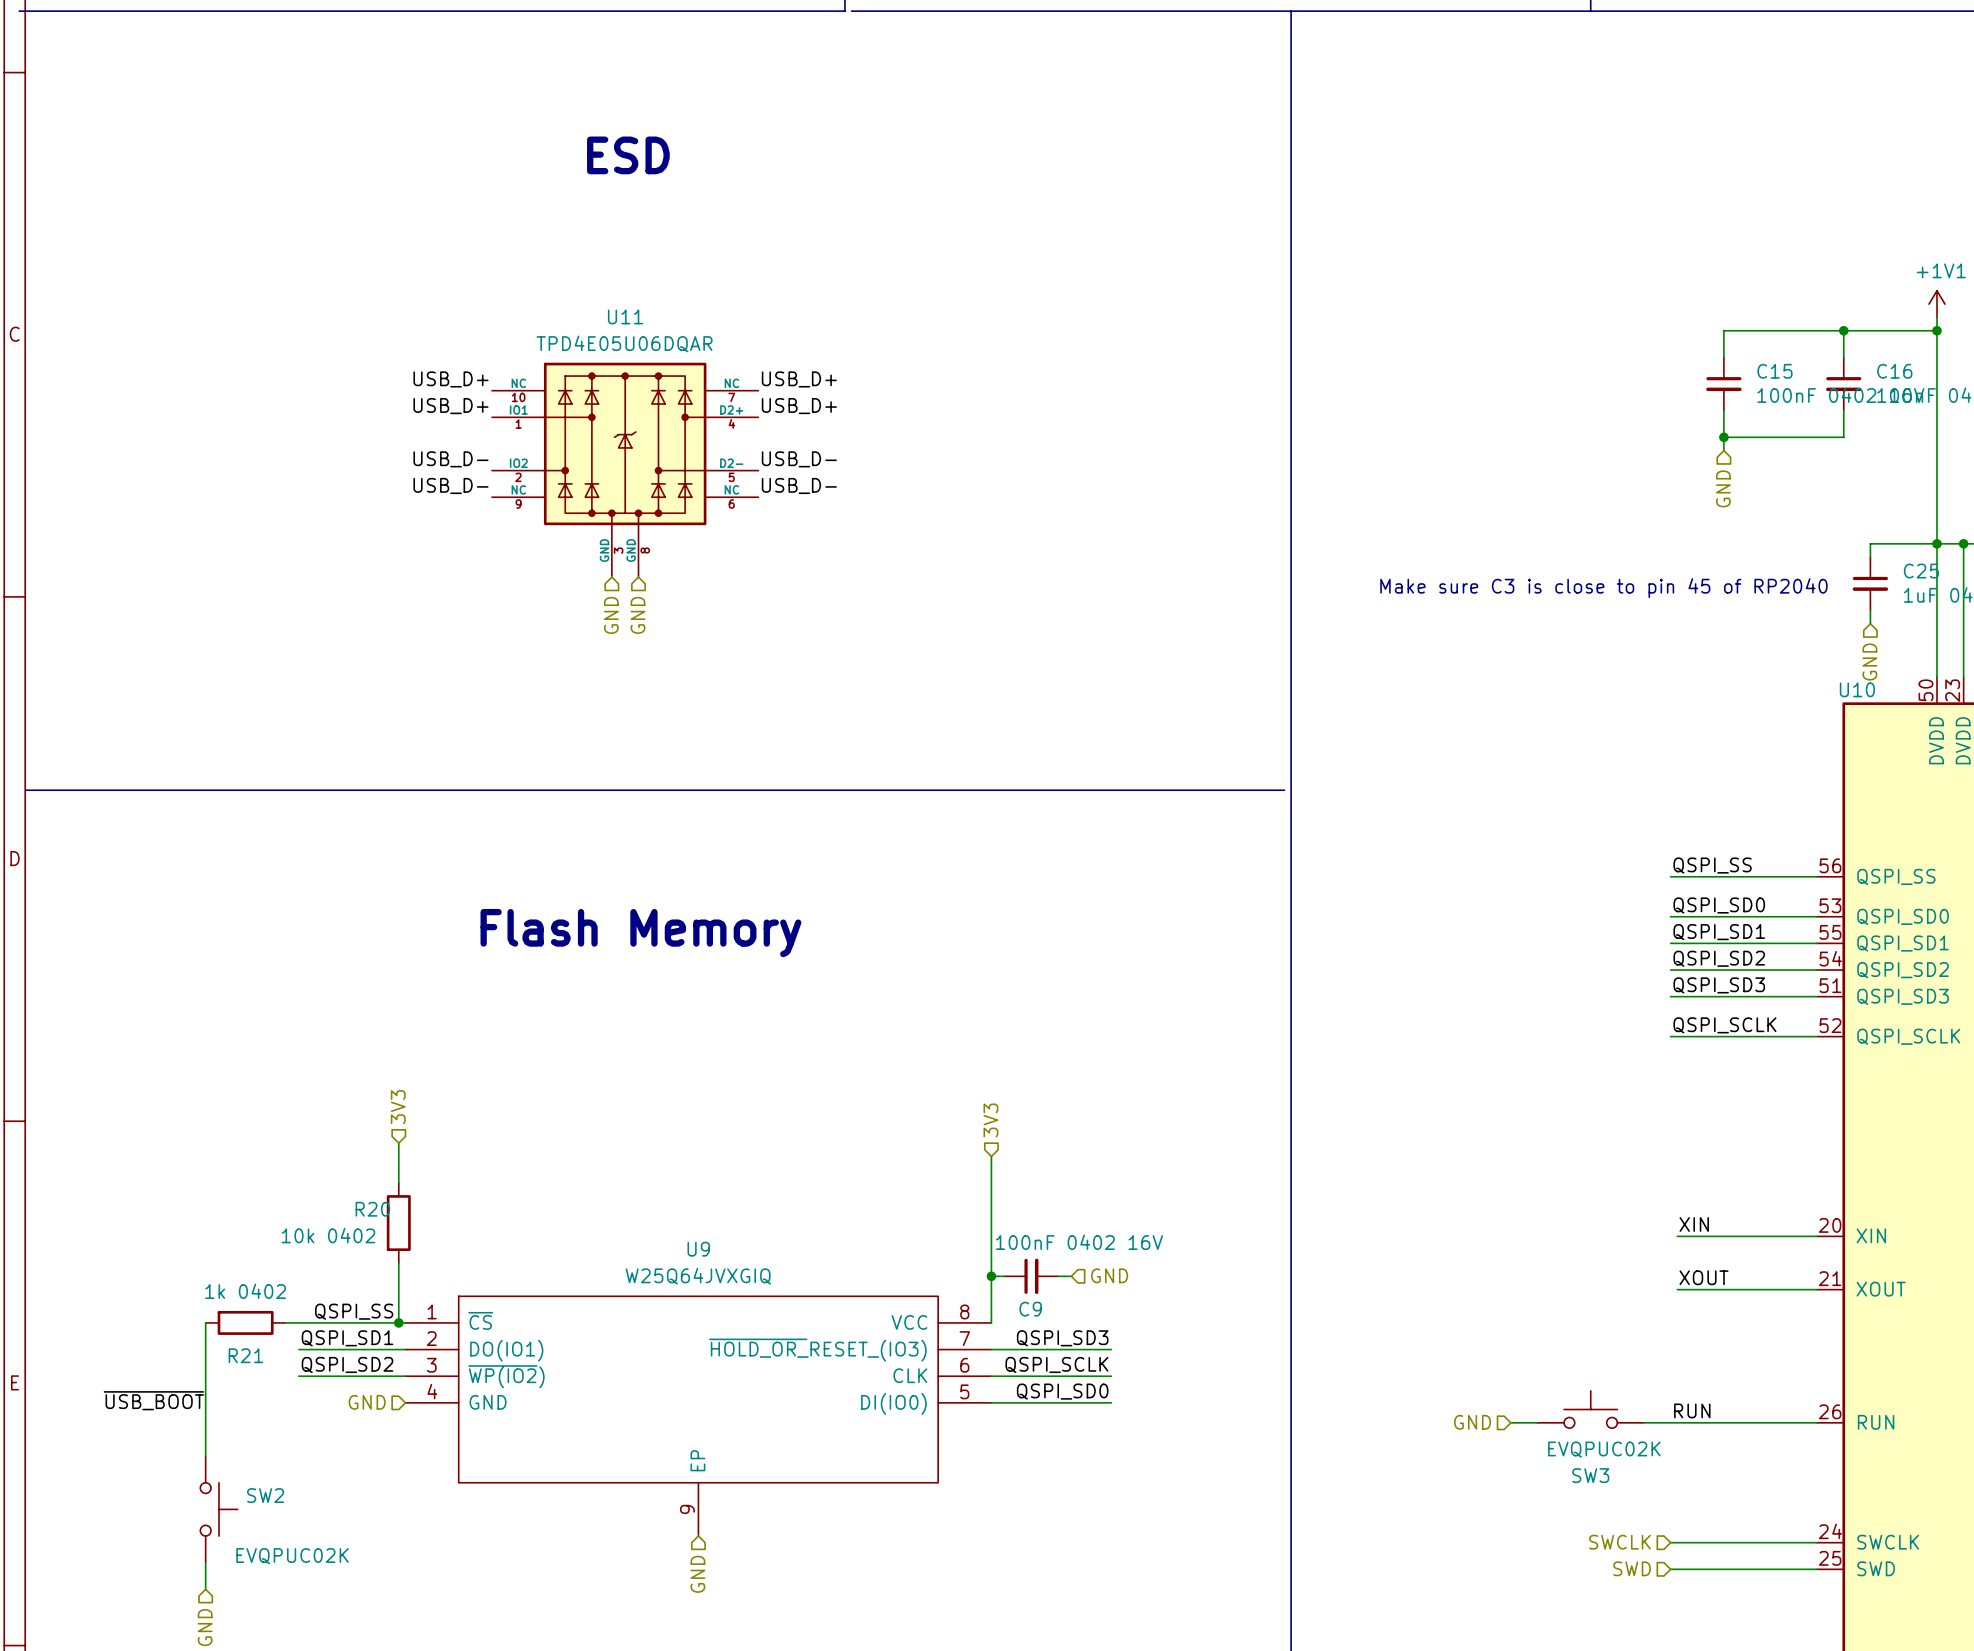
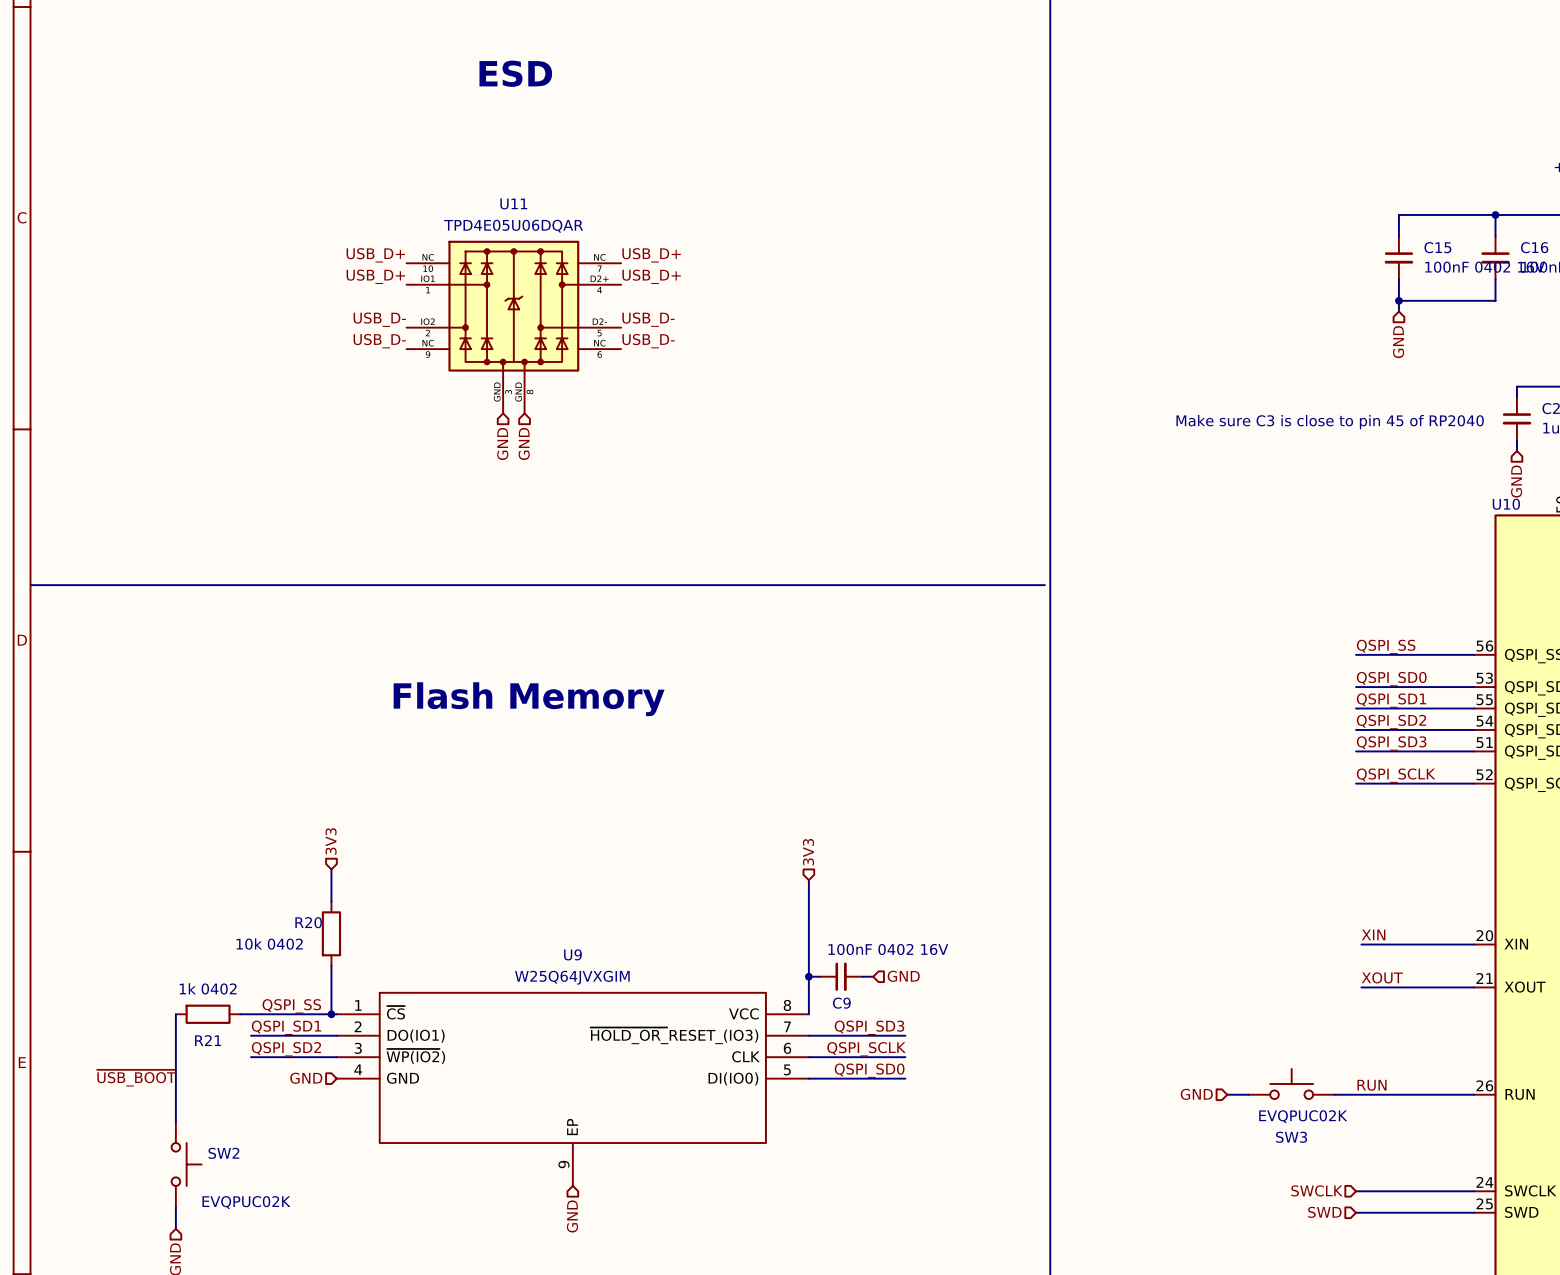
U9 value: W25Q64JVXGIQ (698, 1276) -> W25Q64JVXGIM (572, 977)

